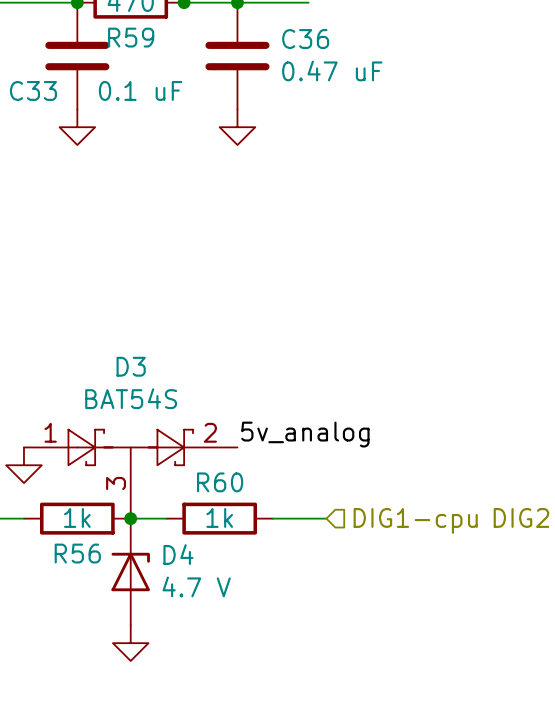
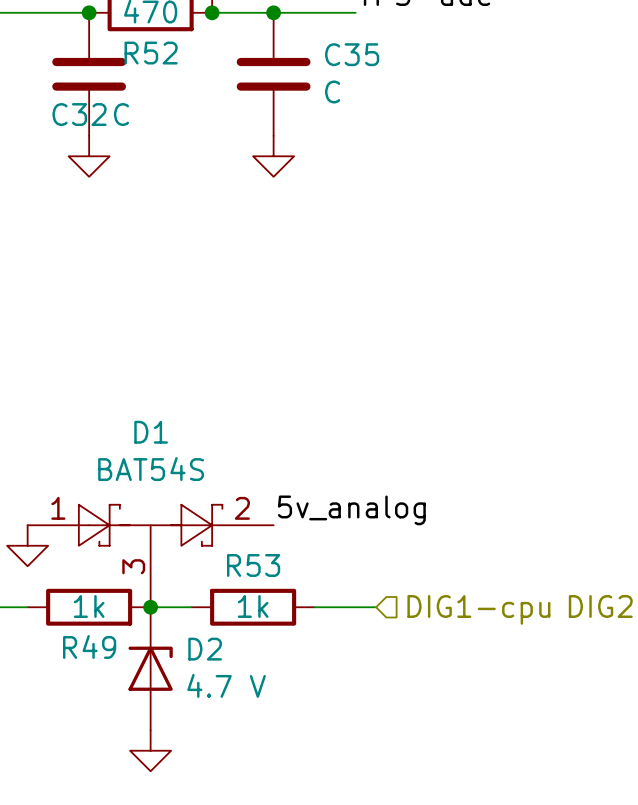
R59 name: R59 (131, 37) -> R52 (151, 53)
C36 name: C36 (305, 39) -> C35 (352, 54)
C36 value: 0.47 uF (332, 70) -> C (332, 91)
C33 name: C33 (33, 90) -> C32 (79, 114)
C33 value: 0.1 uF (140, 90) -> C (121, 114)
D3 name: D3 (131, 366) -> D1 (151, 432)
R60 name: R60 (220, 482) -> R53 (253, 565)
R56 name: R56 (77, 553) -> R49 (89, 646)
D4 name: D4 (178, 554) -> D2 (205, 649)

